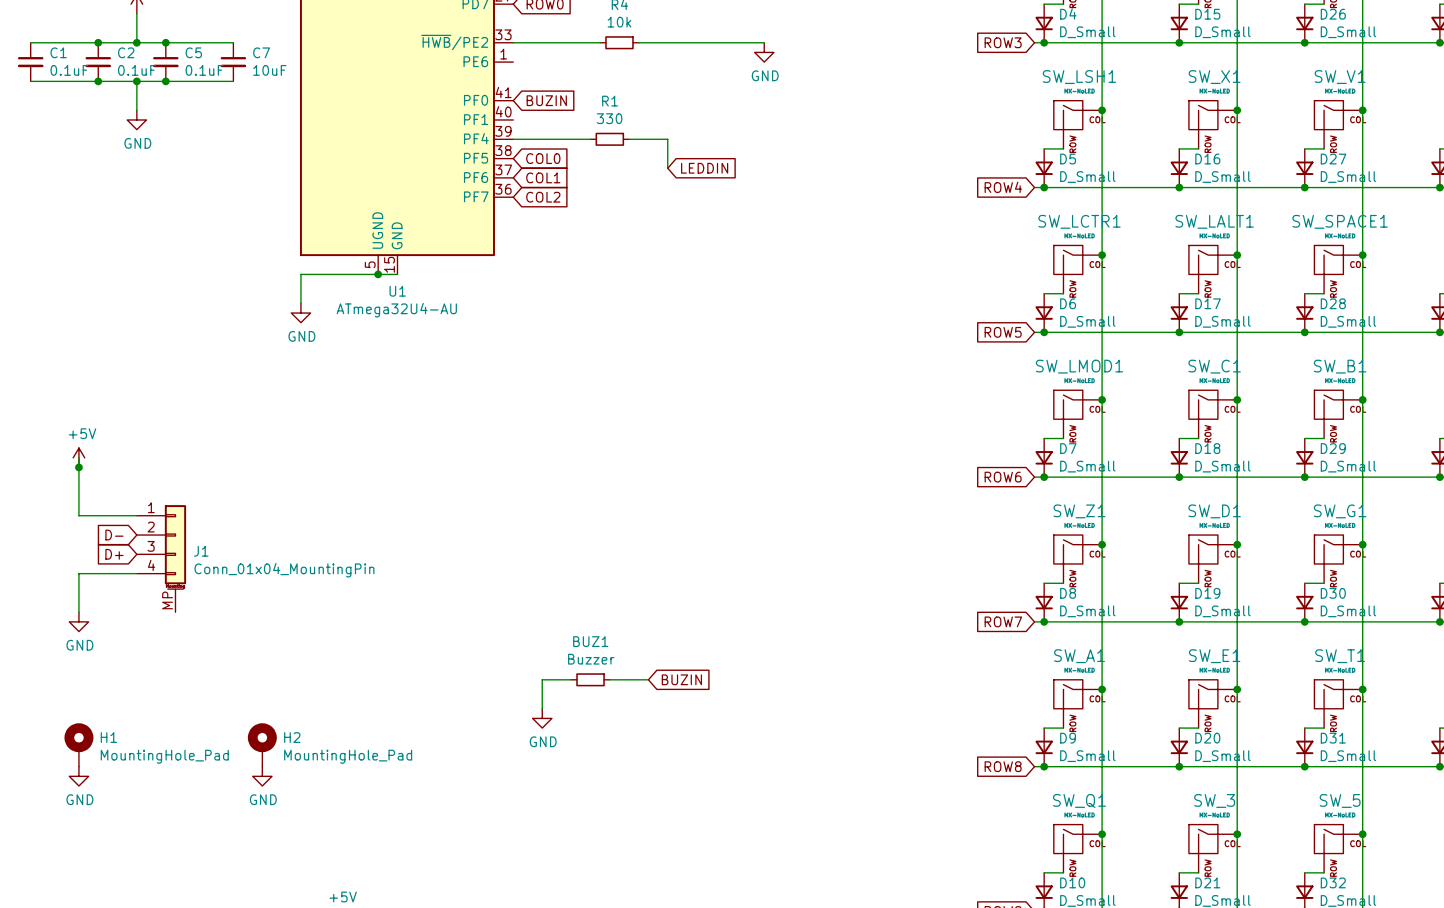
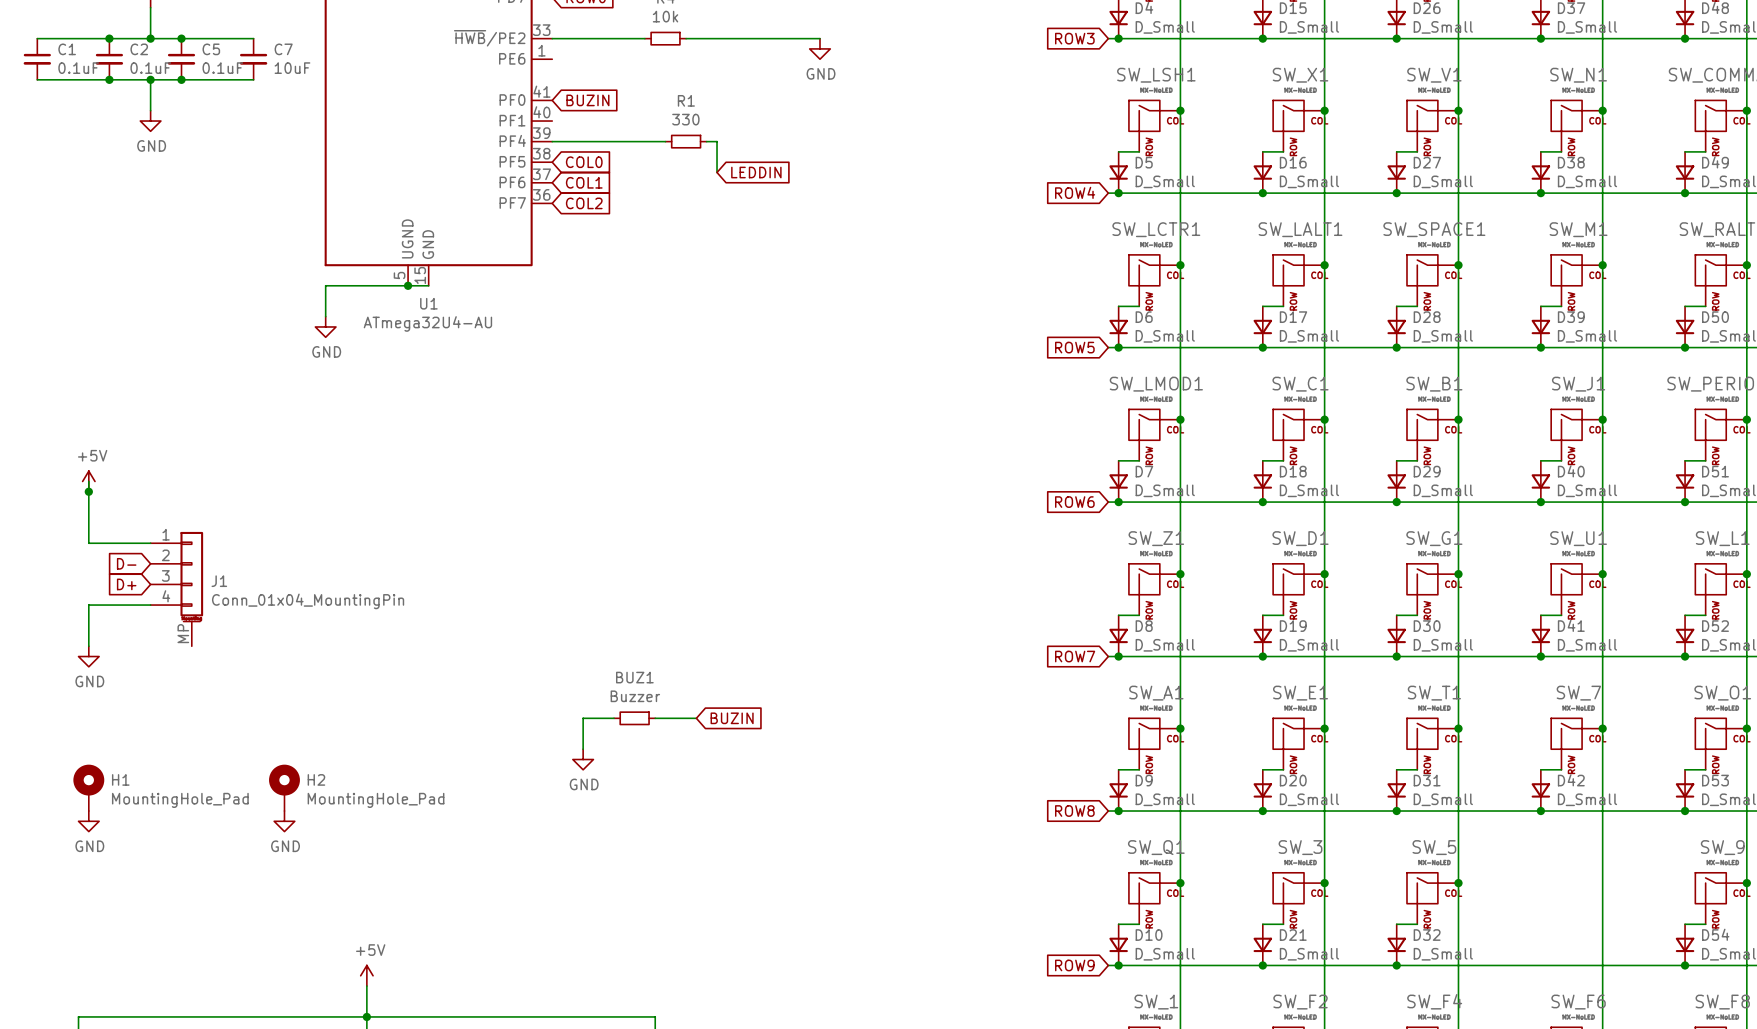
R1 position: (609, 139) -> (686, 141)
wire: (629, 139) (658, 139) -> (634, 141) (665, 141)

